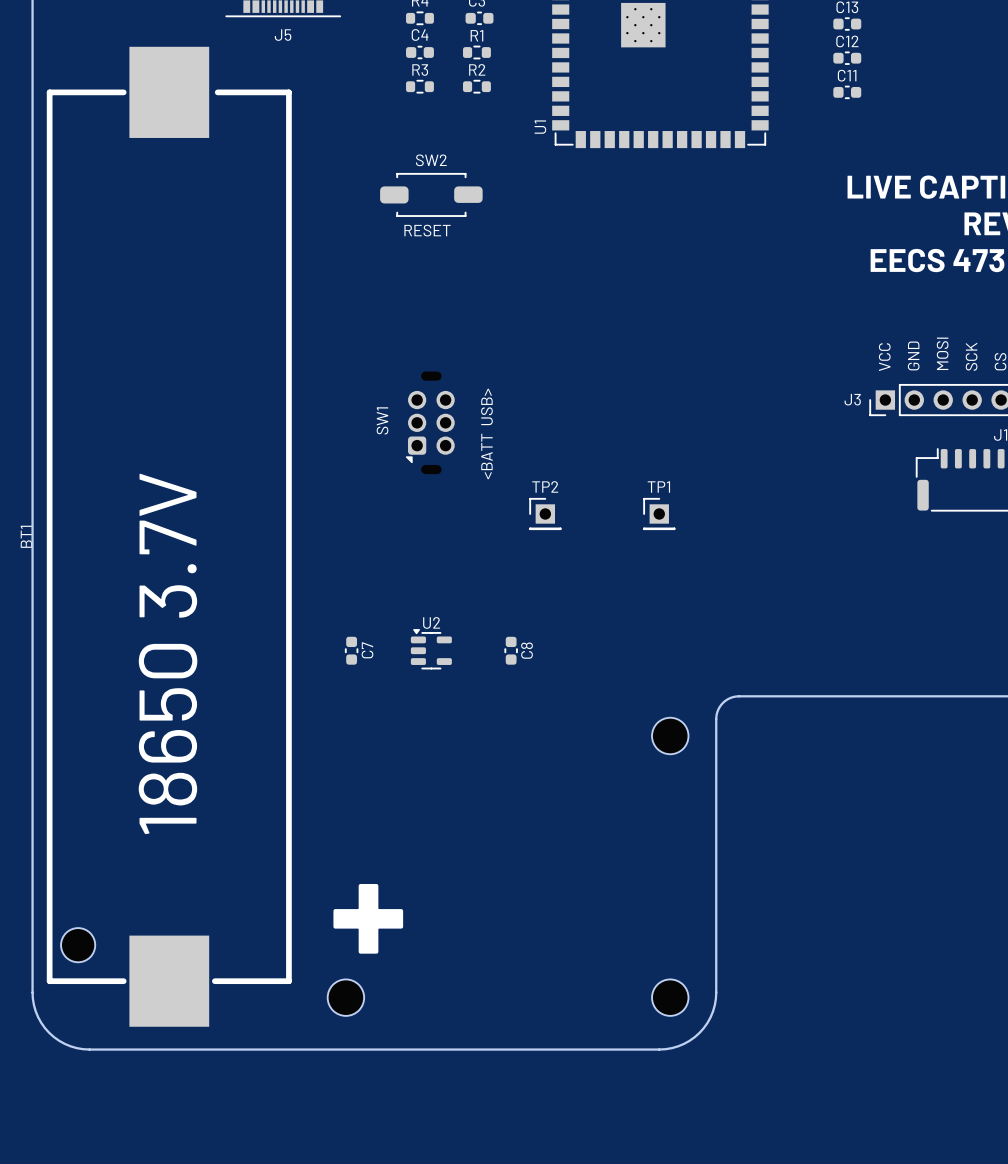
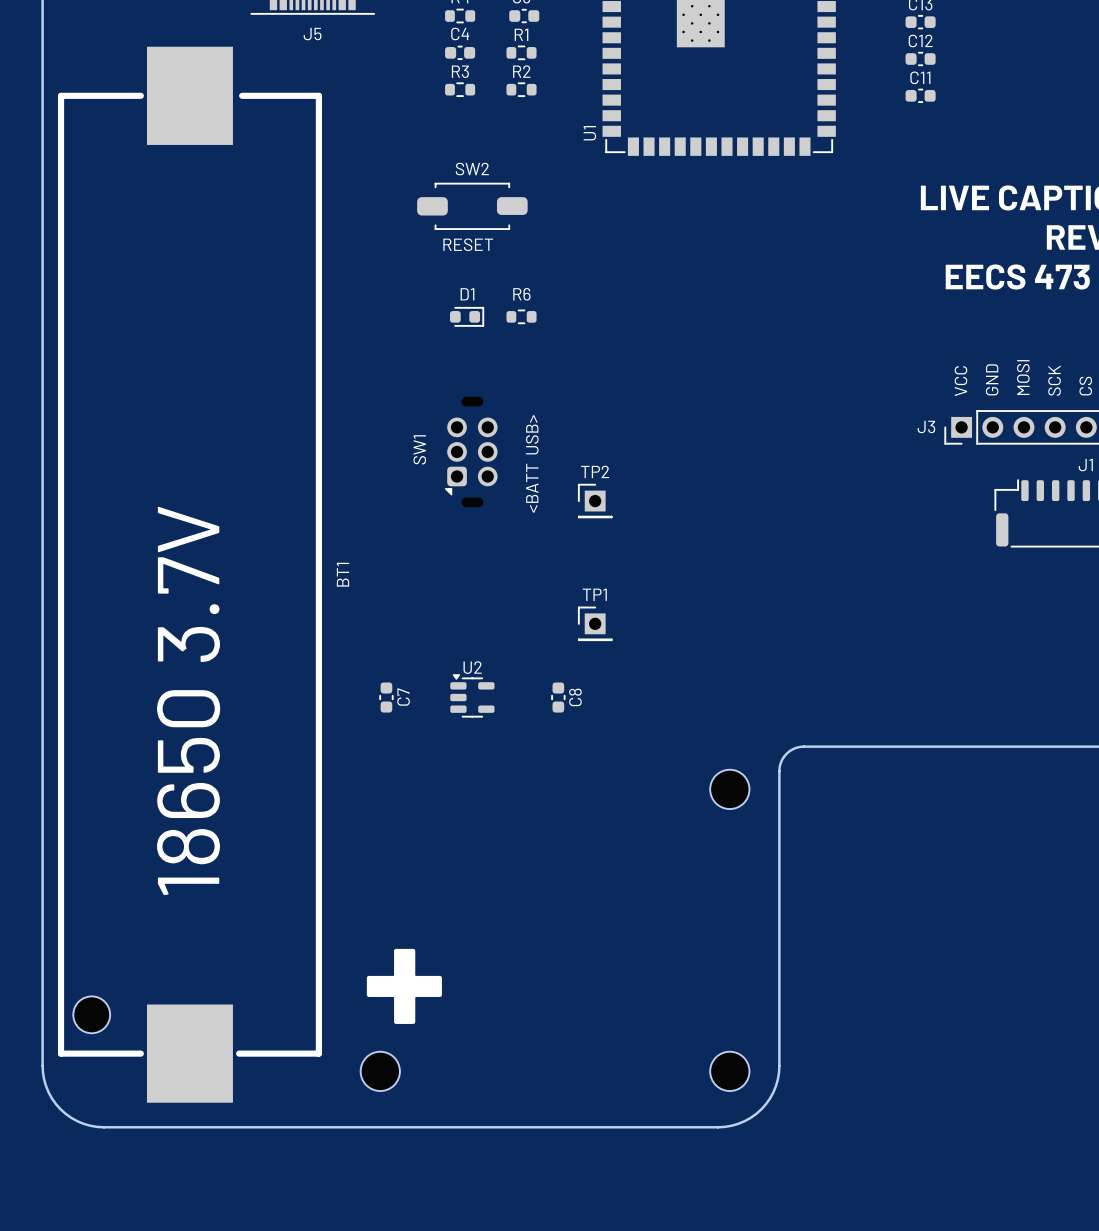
D1: none -> (466, 316)
R6: none -> (521, 316)
TP2 position: (545, 513) -> (595, 501)
TP1 position: (659, 513) -> (595, 623)
BT1 name position: BT1 (26, 536) -> BT1 (343, 574)

